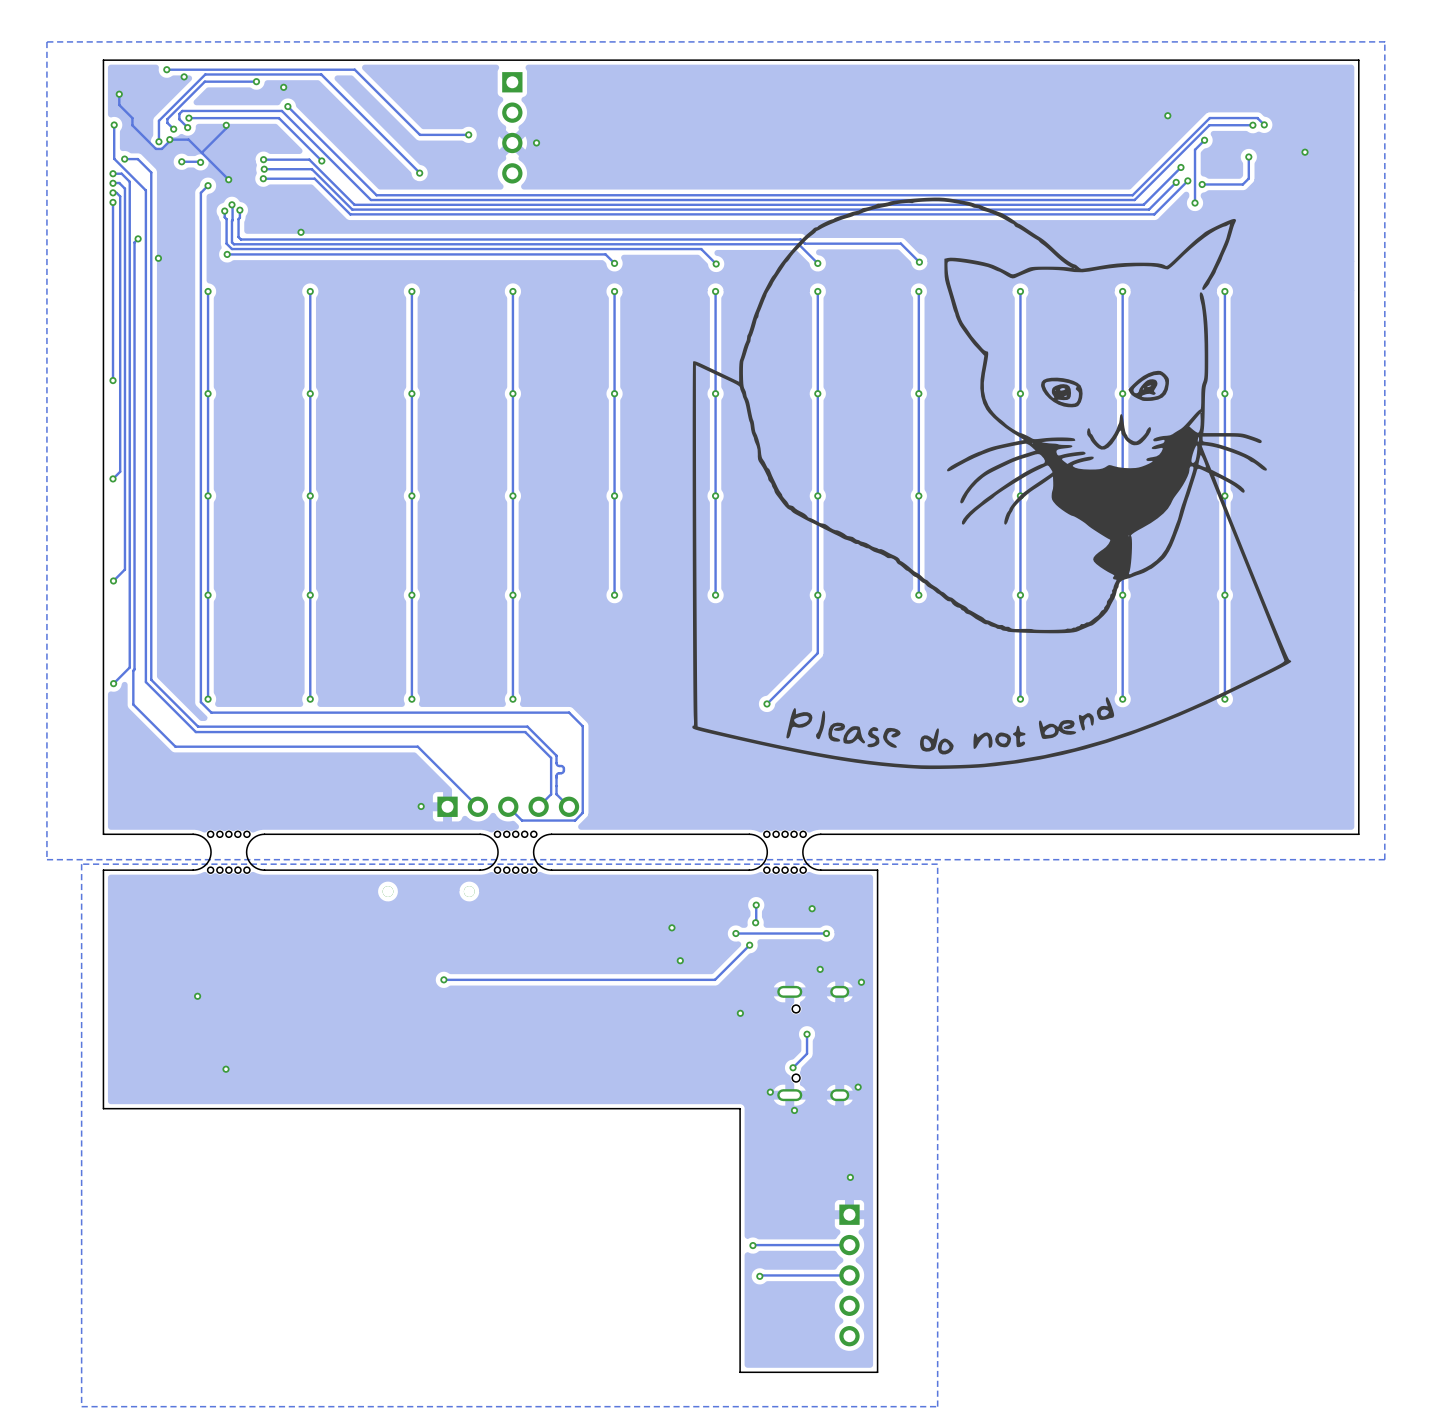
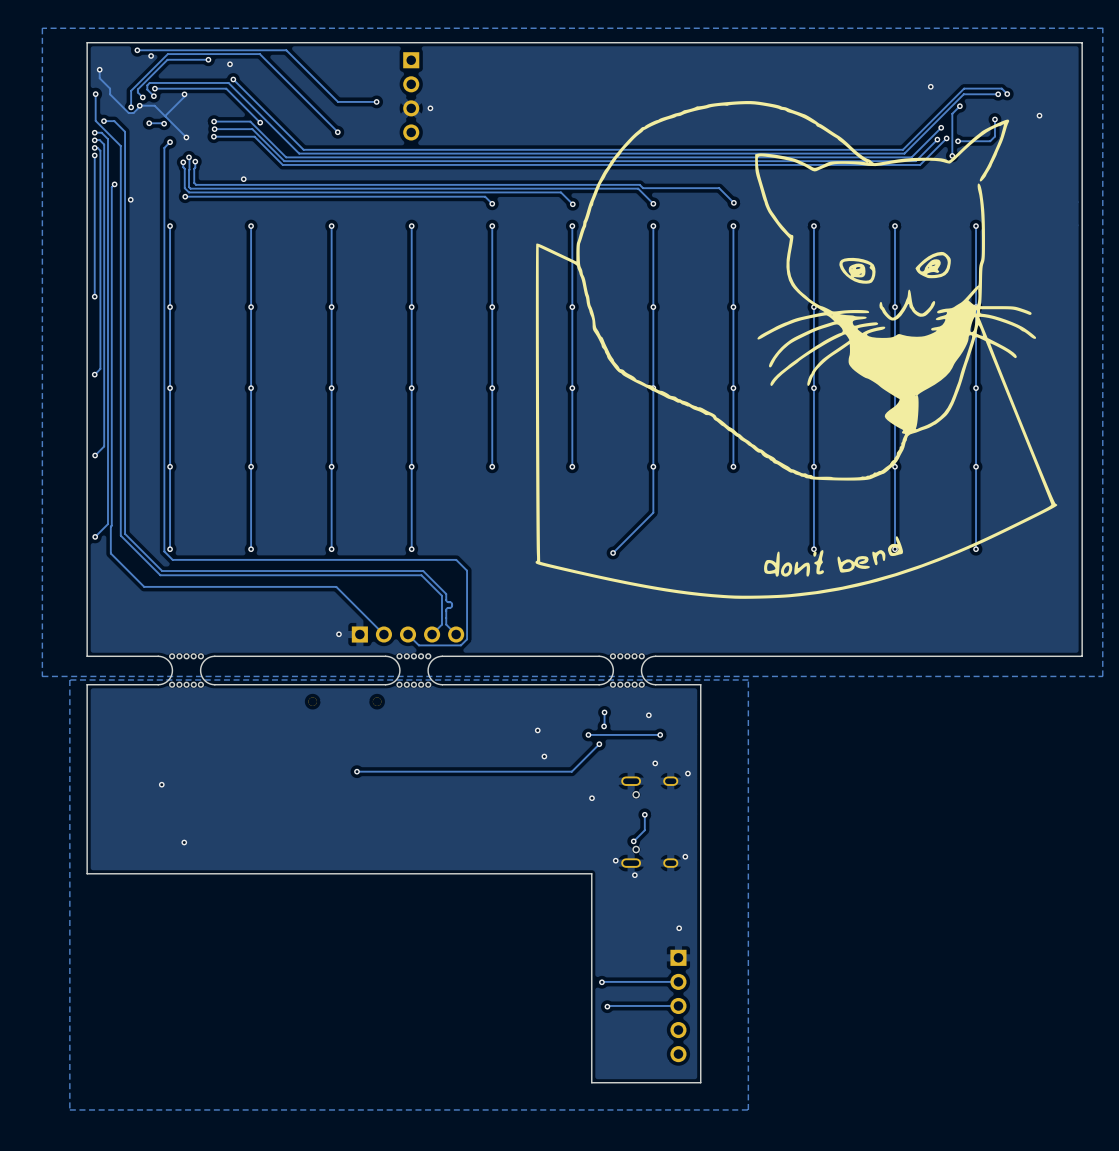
drawing: none -> [535, 101, 1058, 599]
drawing: [692, 197, 1292, 770] -> none

